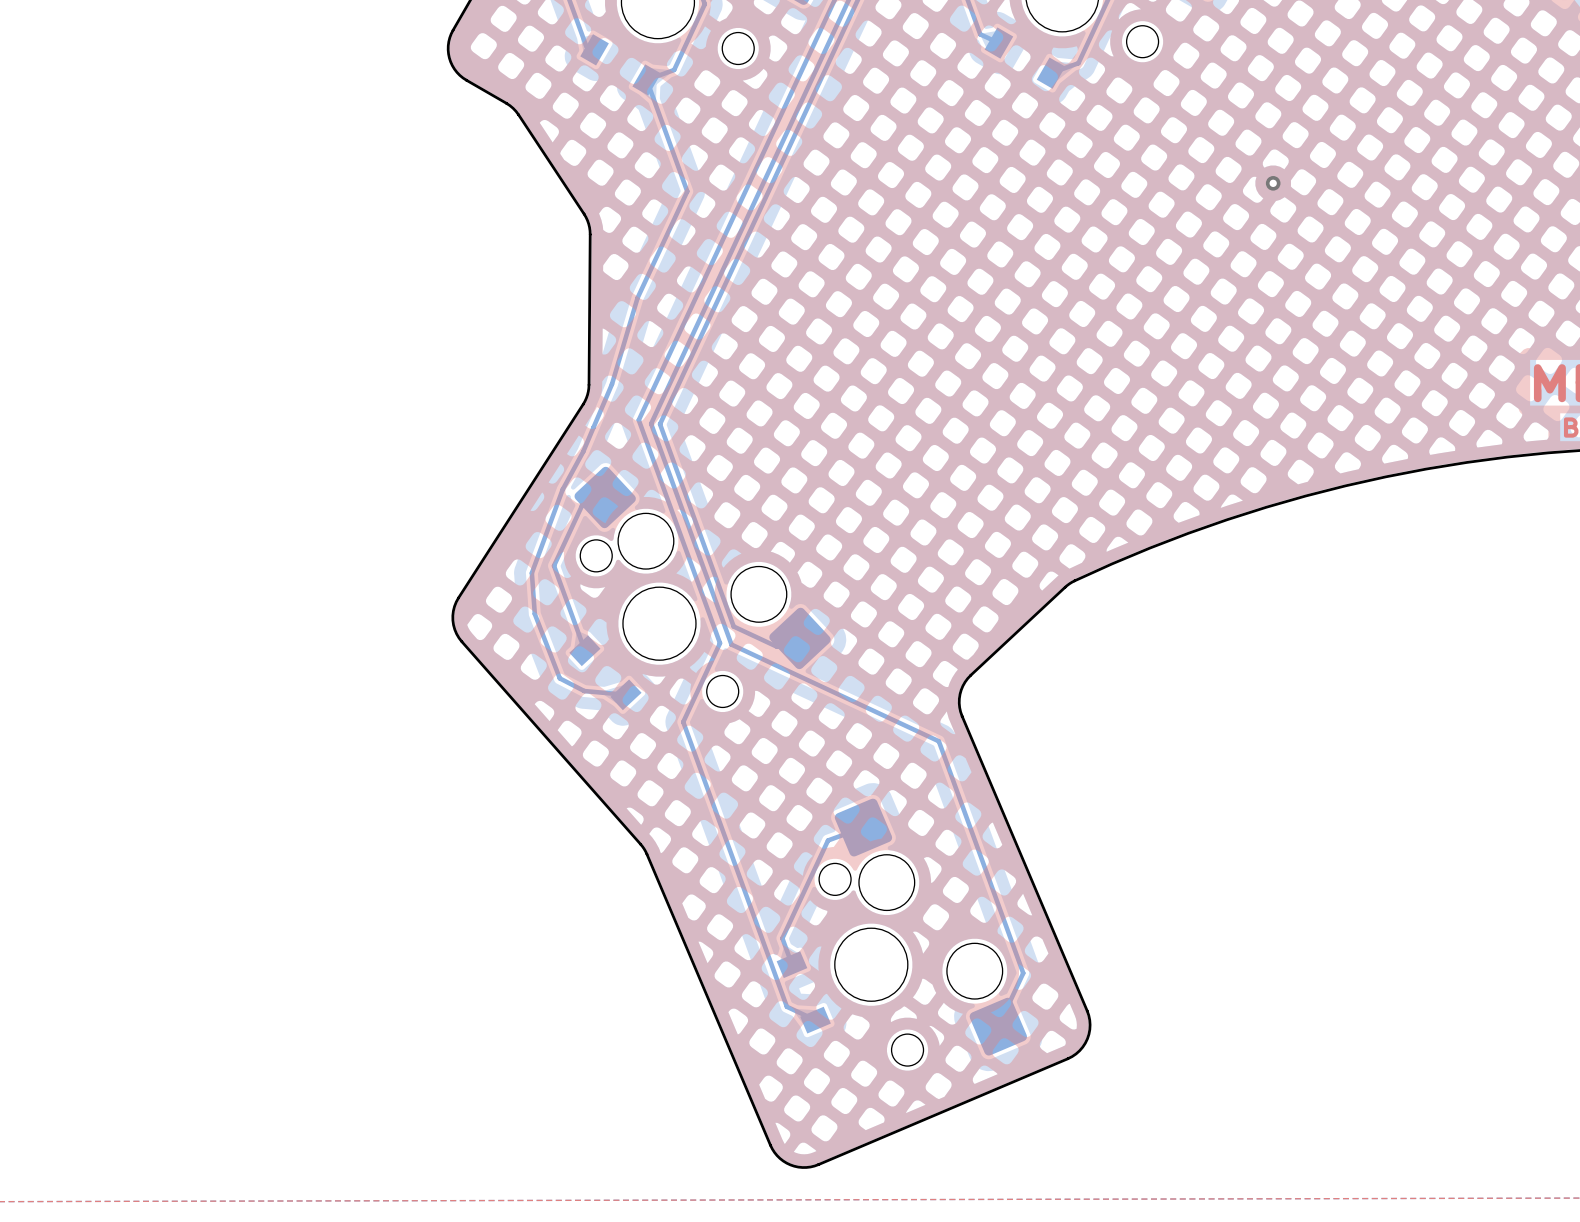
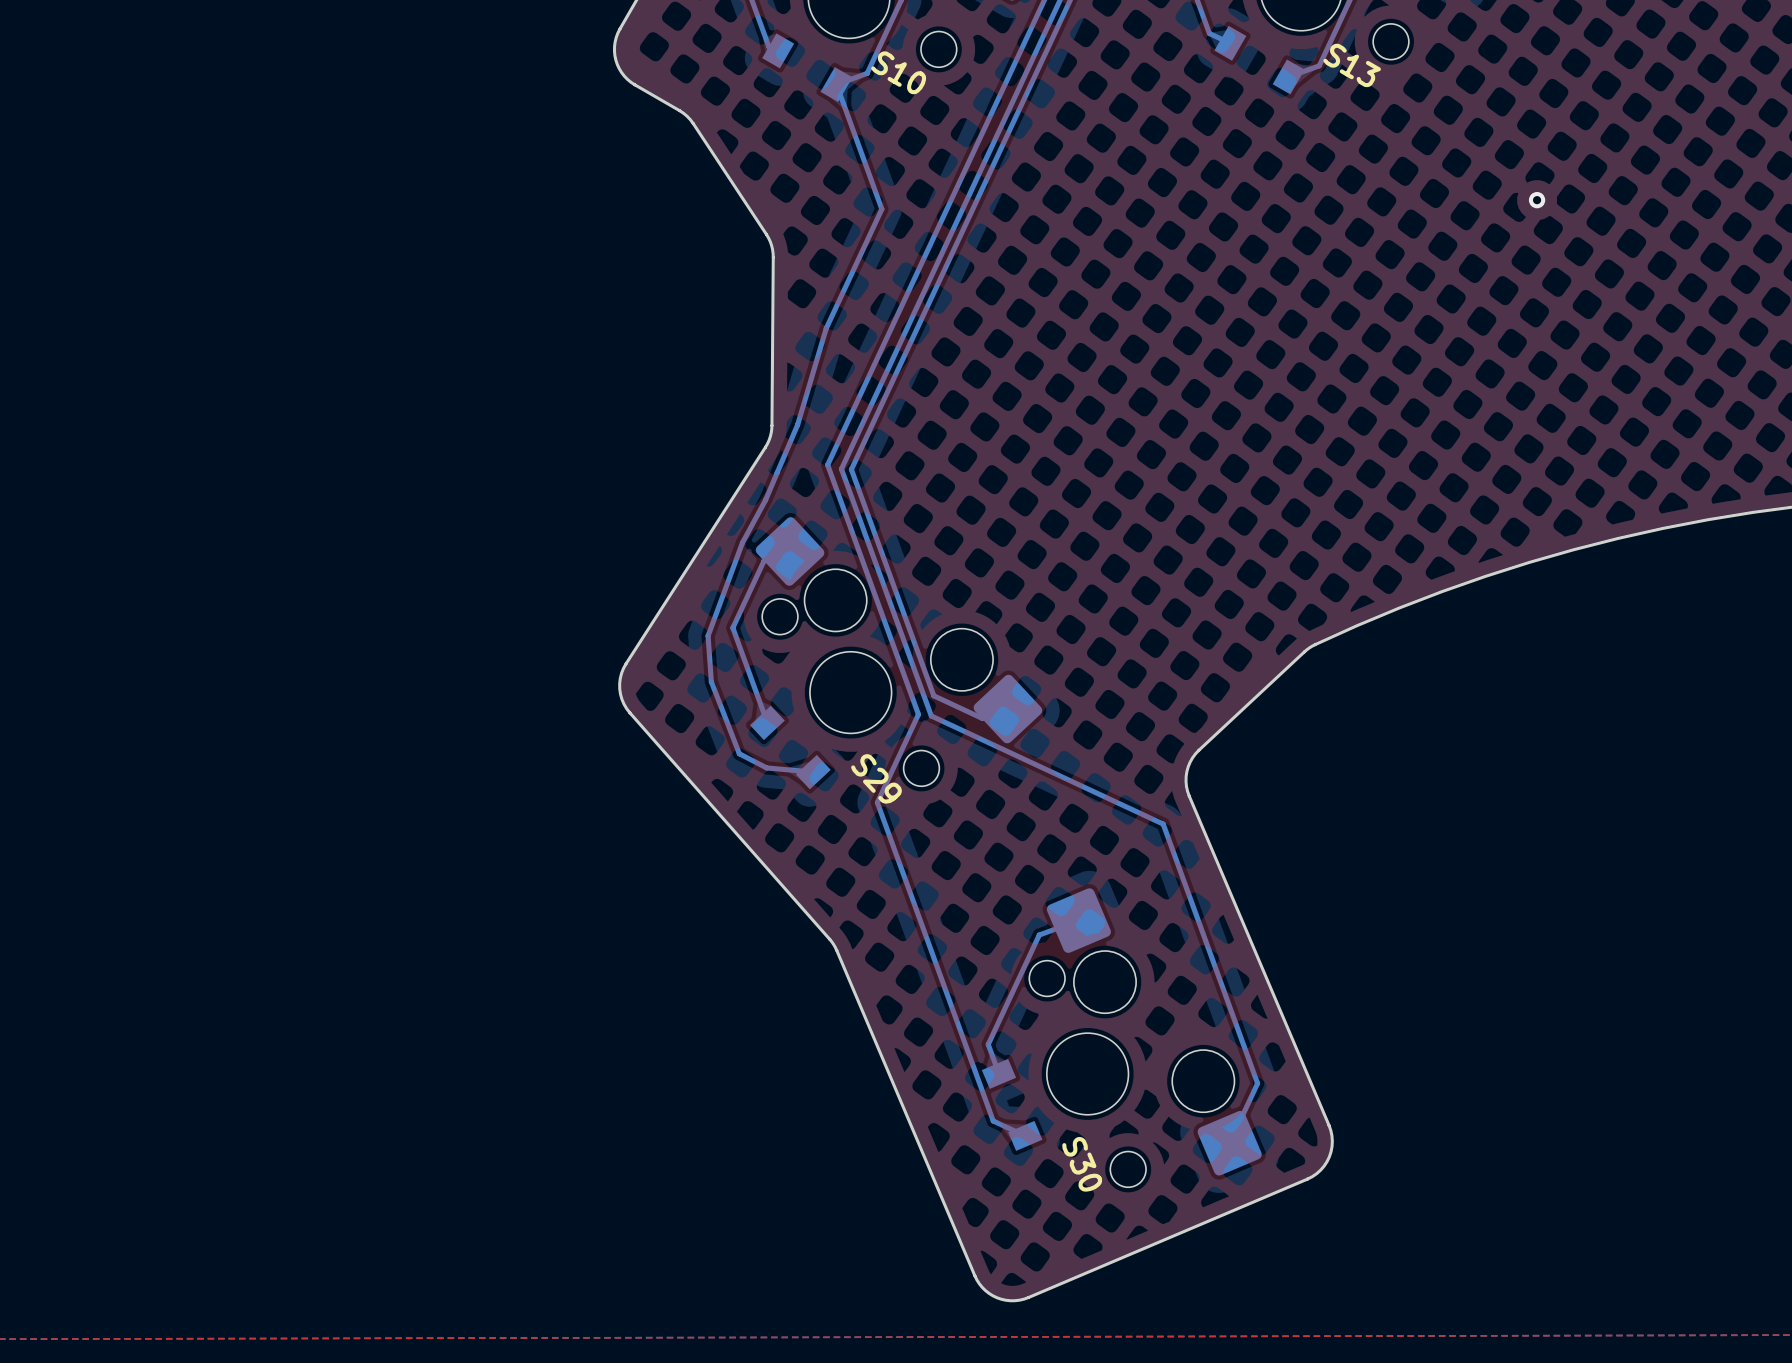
S13 name: none -> S13 (1352, 65)
S10 name: none -> S10 (898, 72)
S29 name: none -> S29 (876, 778)
S30 name: none -> S30 (1082, 1164)

